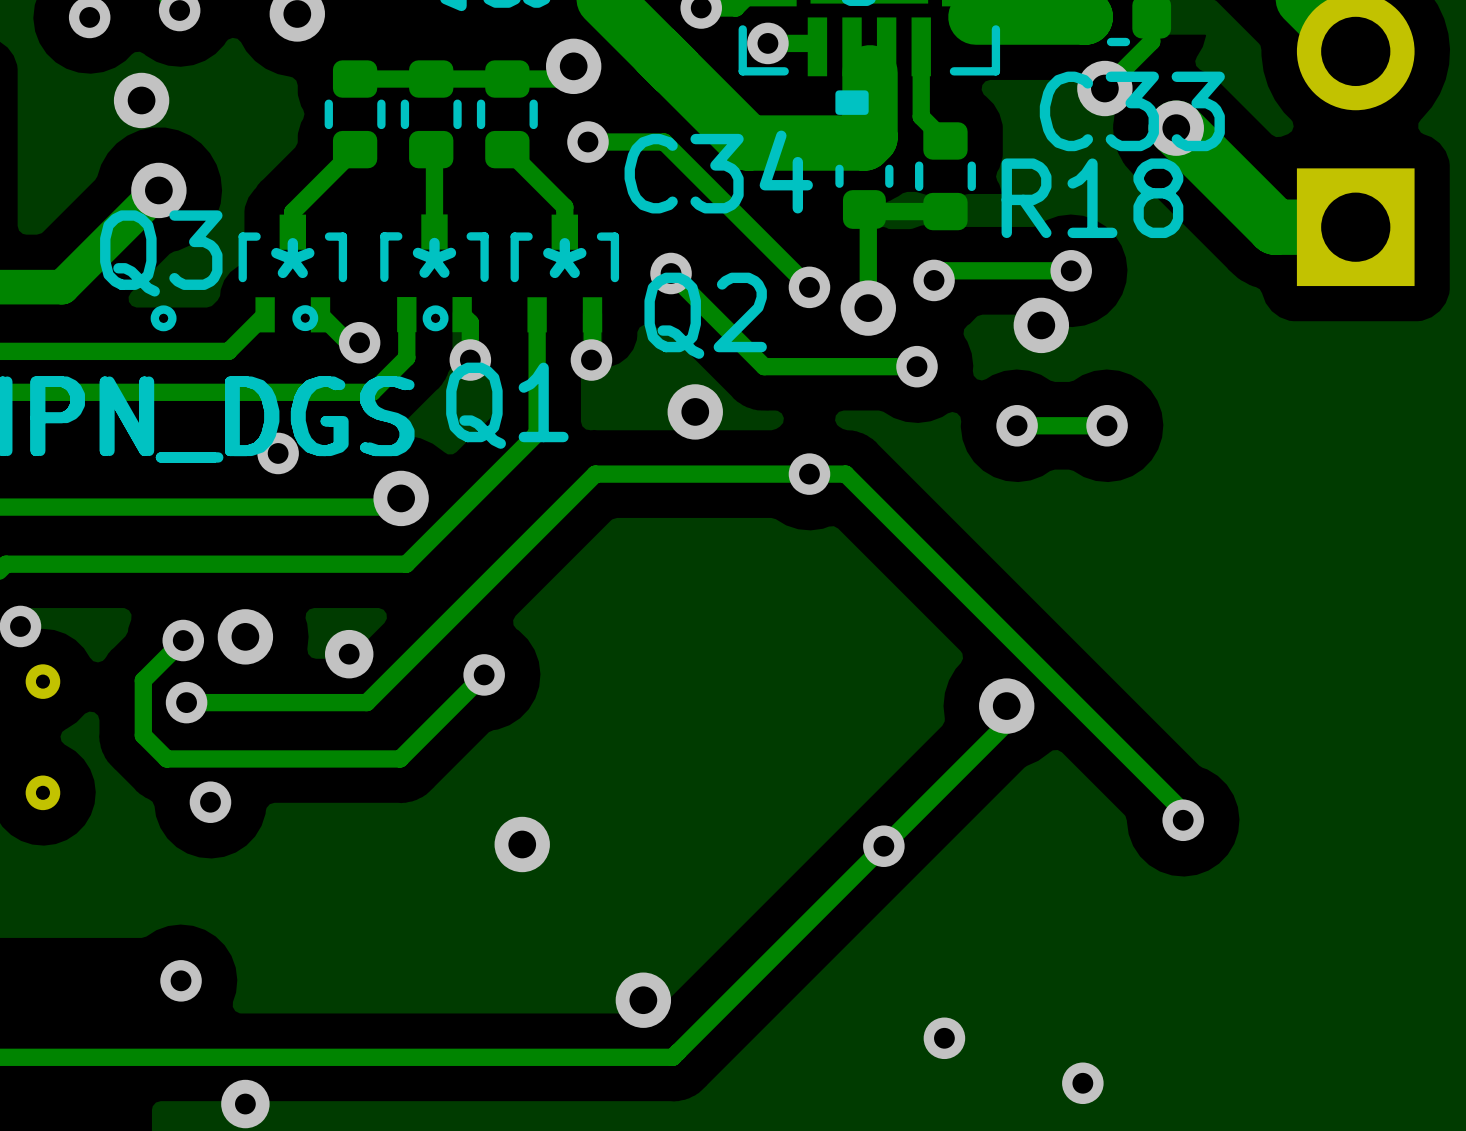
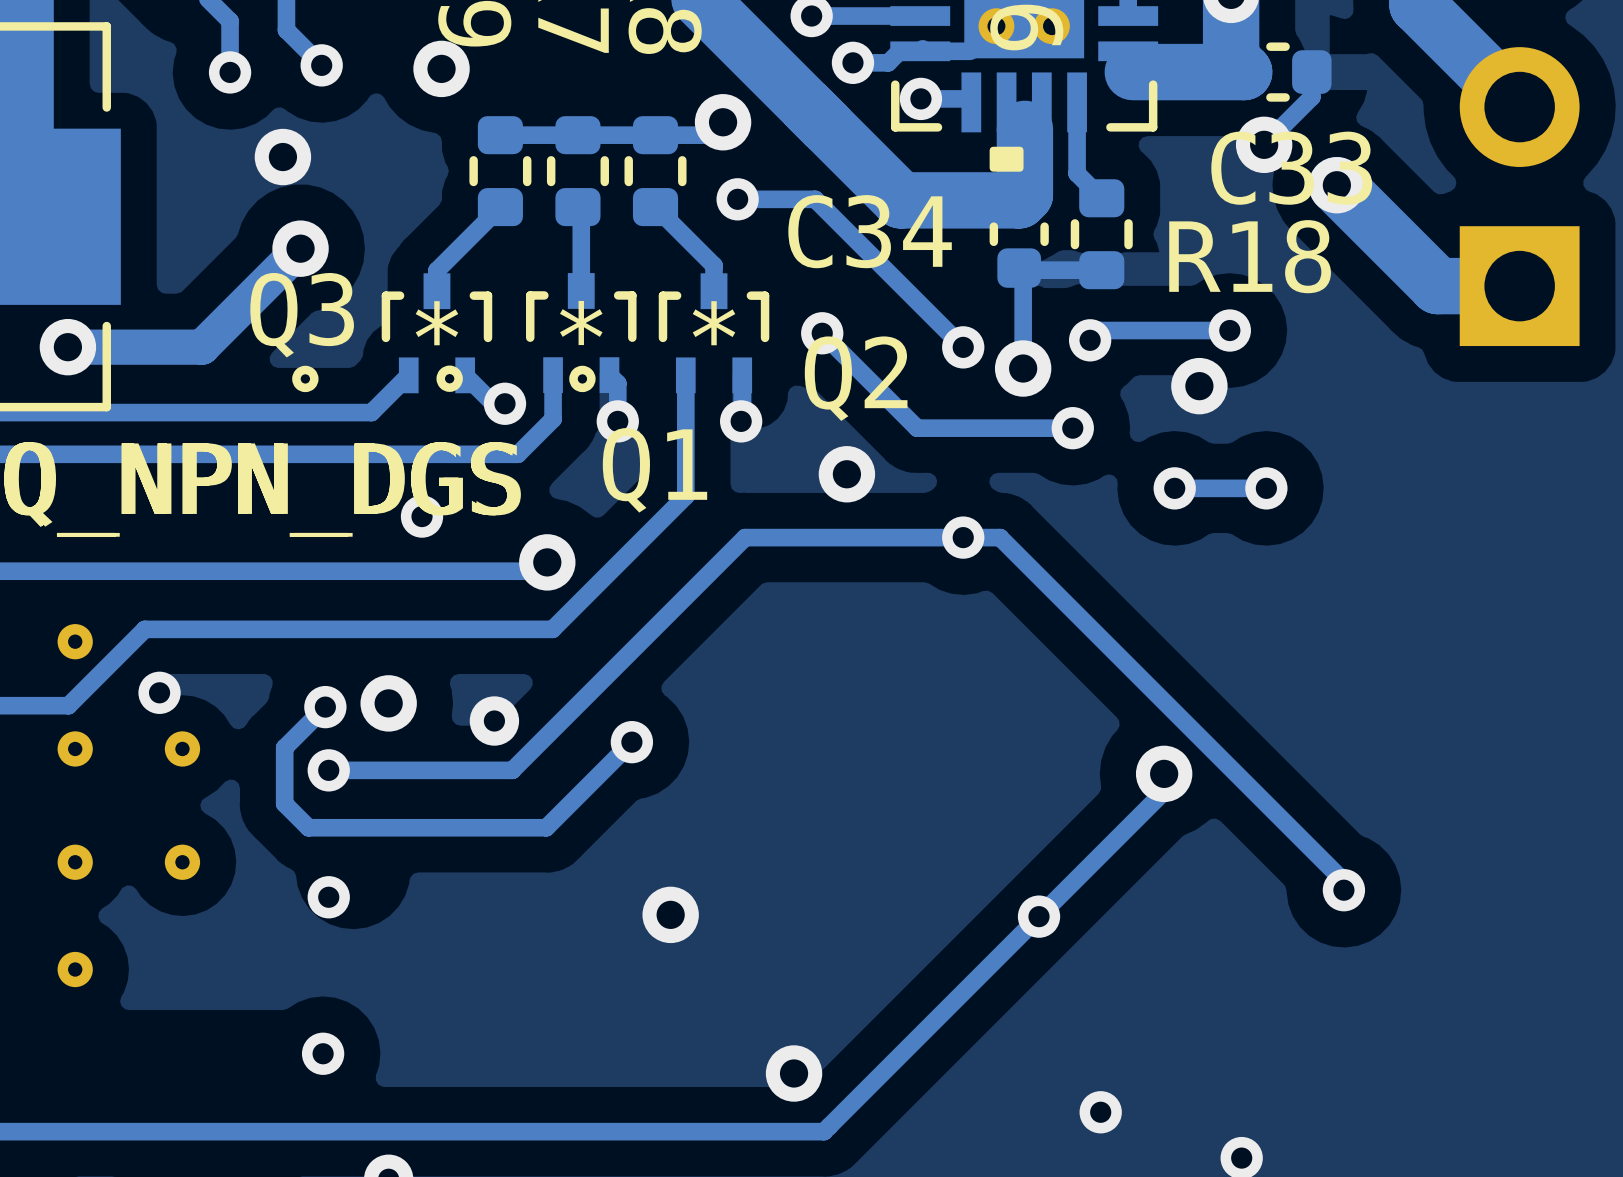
via position: (210, 802) -> (328, 897)

